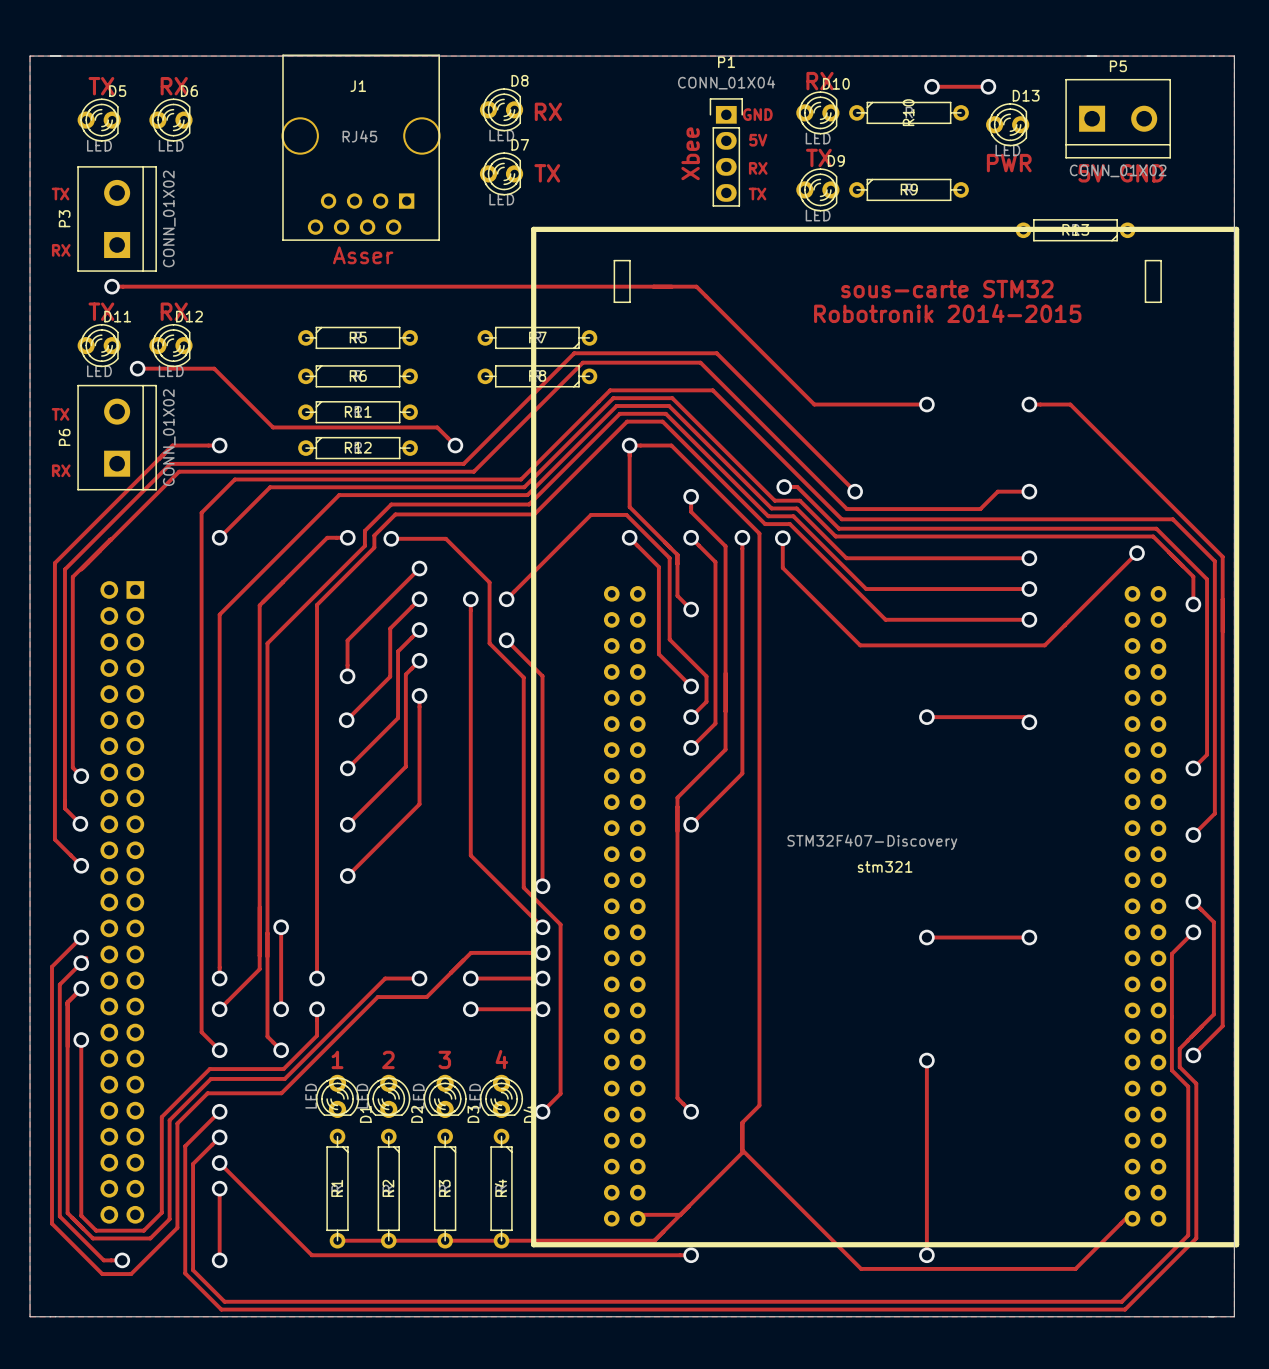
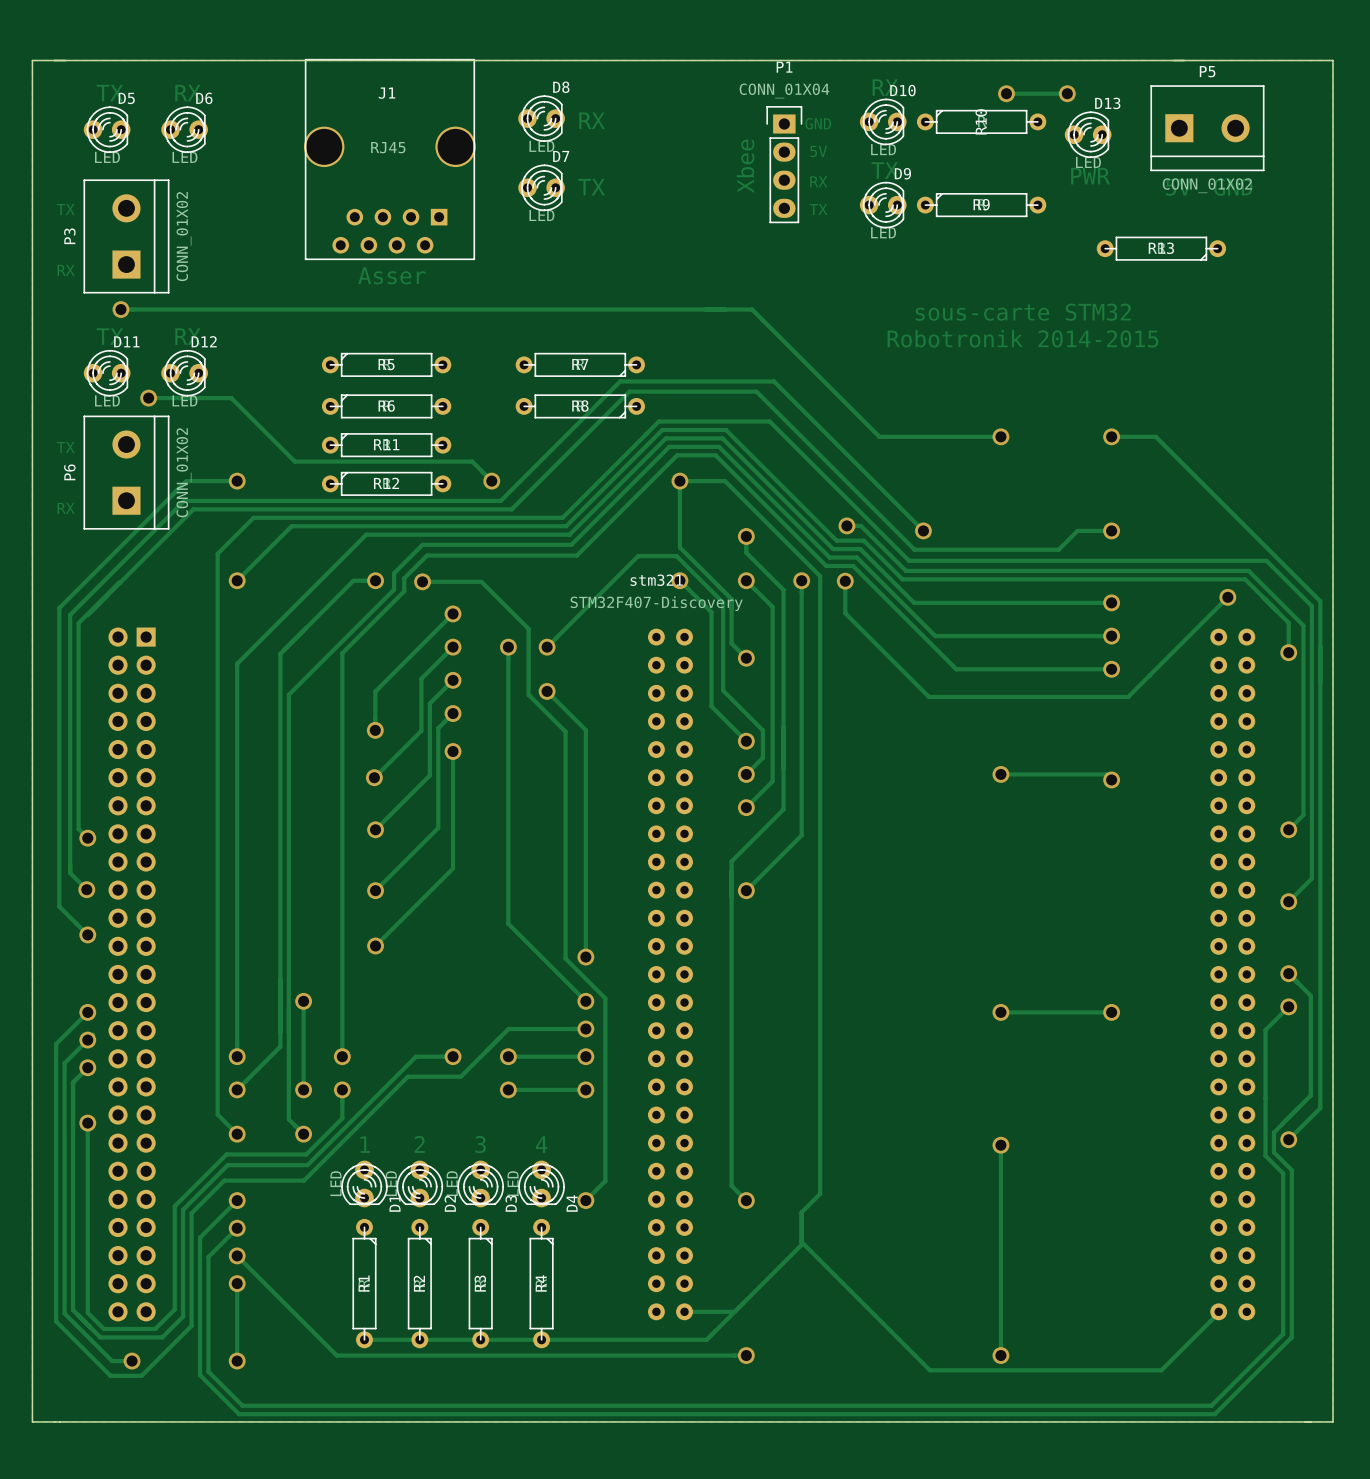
stm321 footprint: [531, 226, 1240, 1248] -> [647, 628, 1256, 1321]
stm321 value position: STM32F407-Discovery (872, 842) -> STM32F407-Discovery (656, 603)
stm321 name position: stm321 (885, 866) -> stm321 (656, 580)

